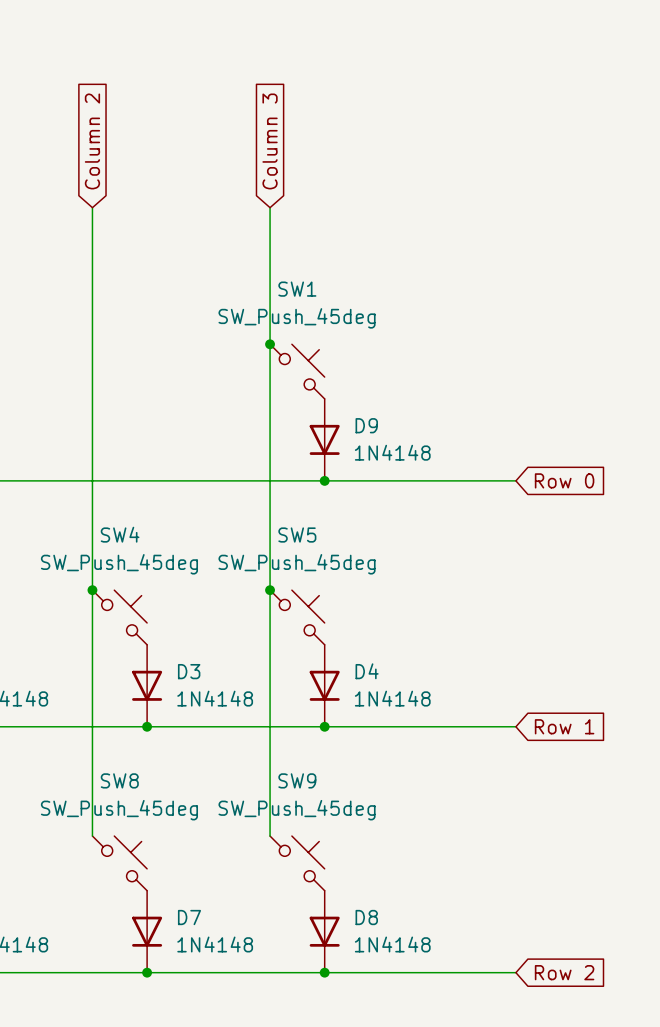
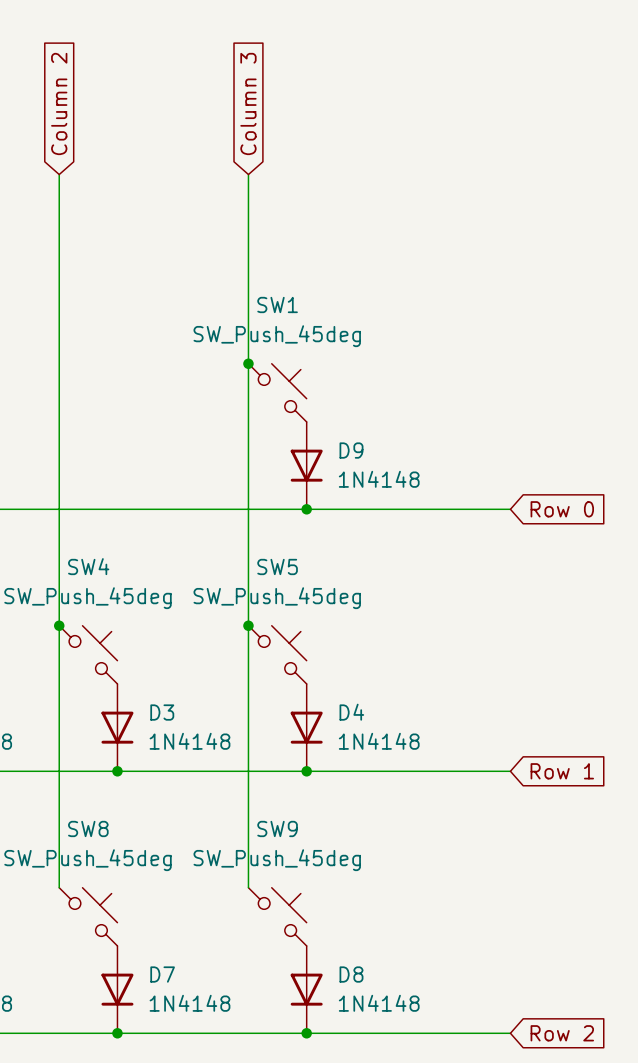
global label position: Column 2 (92, 141) -> Column 2 (59, 103)
global label position: Column 3 (270, 141) -> Column 3 (248, 103)
wire: none -> (59, 174) (59, 218)
wire: none -> (248, 174) (248, 218)

